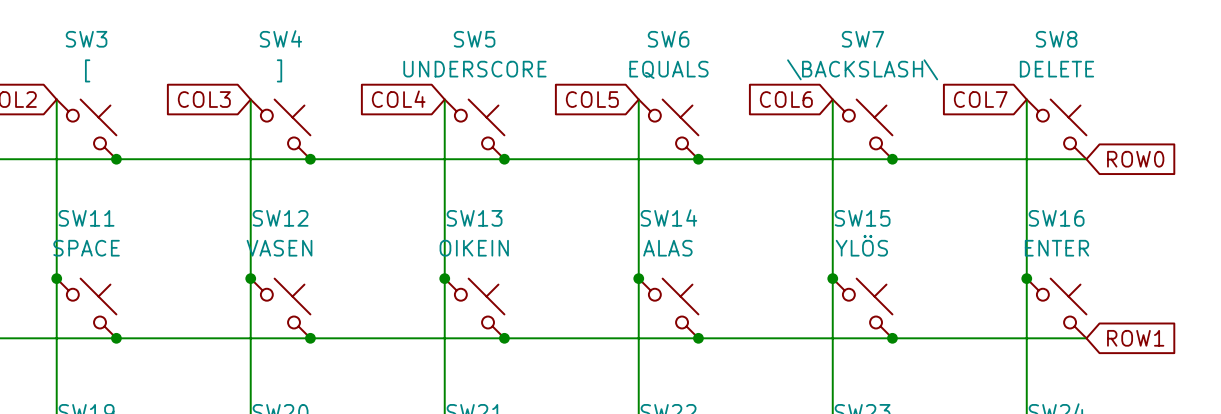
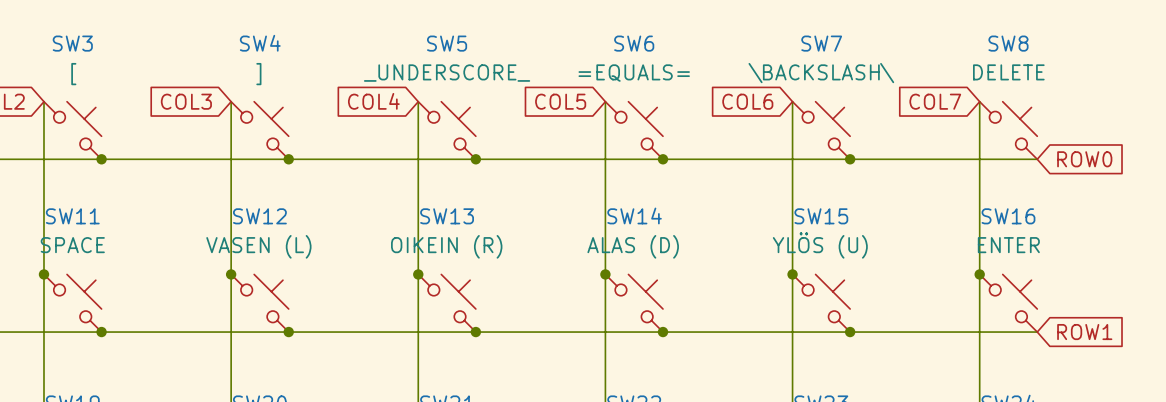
SW5 value: UNDERSCORE (474, 69) -> _UNDERSCORE_ (447, 73)
SW6 value: EQUALS (668, 69) -> =EQUALS= (634, 73)
SW15 value: YLÖS (861, 245) -> YLÖS (U) (820, 245)
SW12 value: VASEN (279, 248) -> VASEN (L) (258, 246)
SW13 value: OIKEIN (474, 248) -> OIKEIN (R) (446, 246)
SW14 value: ALAS (667, 248) -> ALAS (D) (633, 246)

